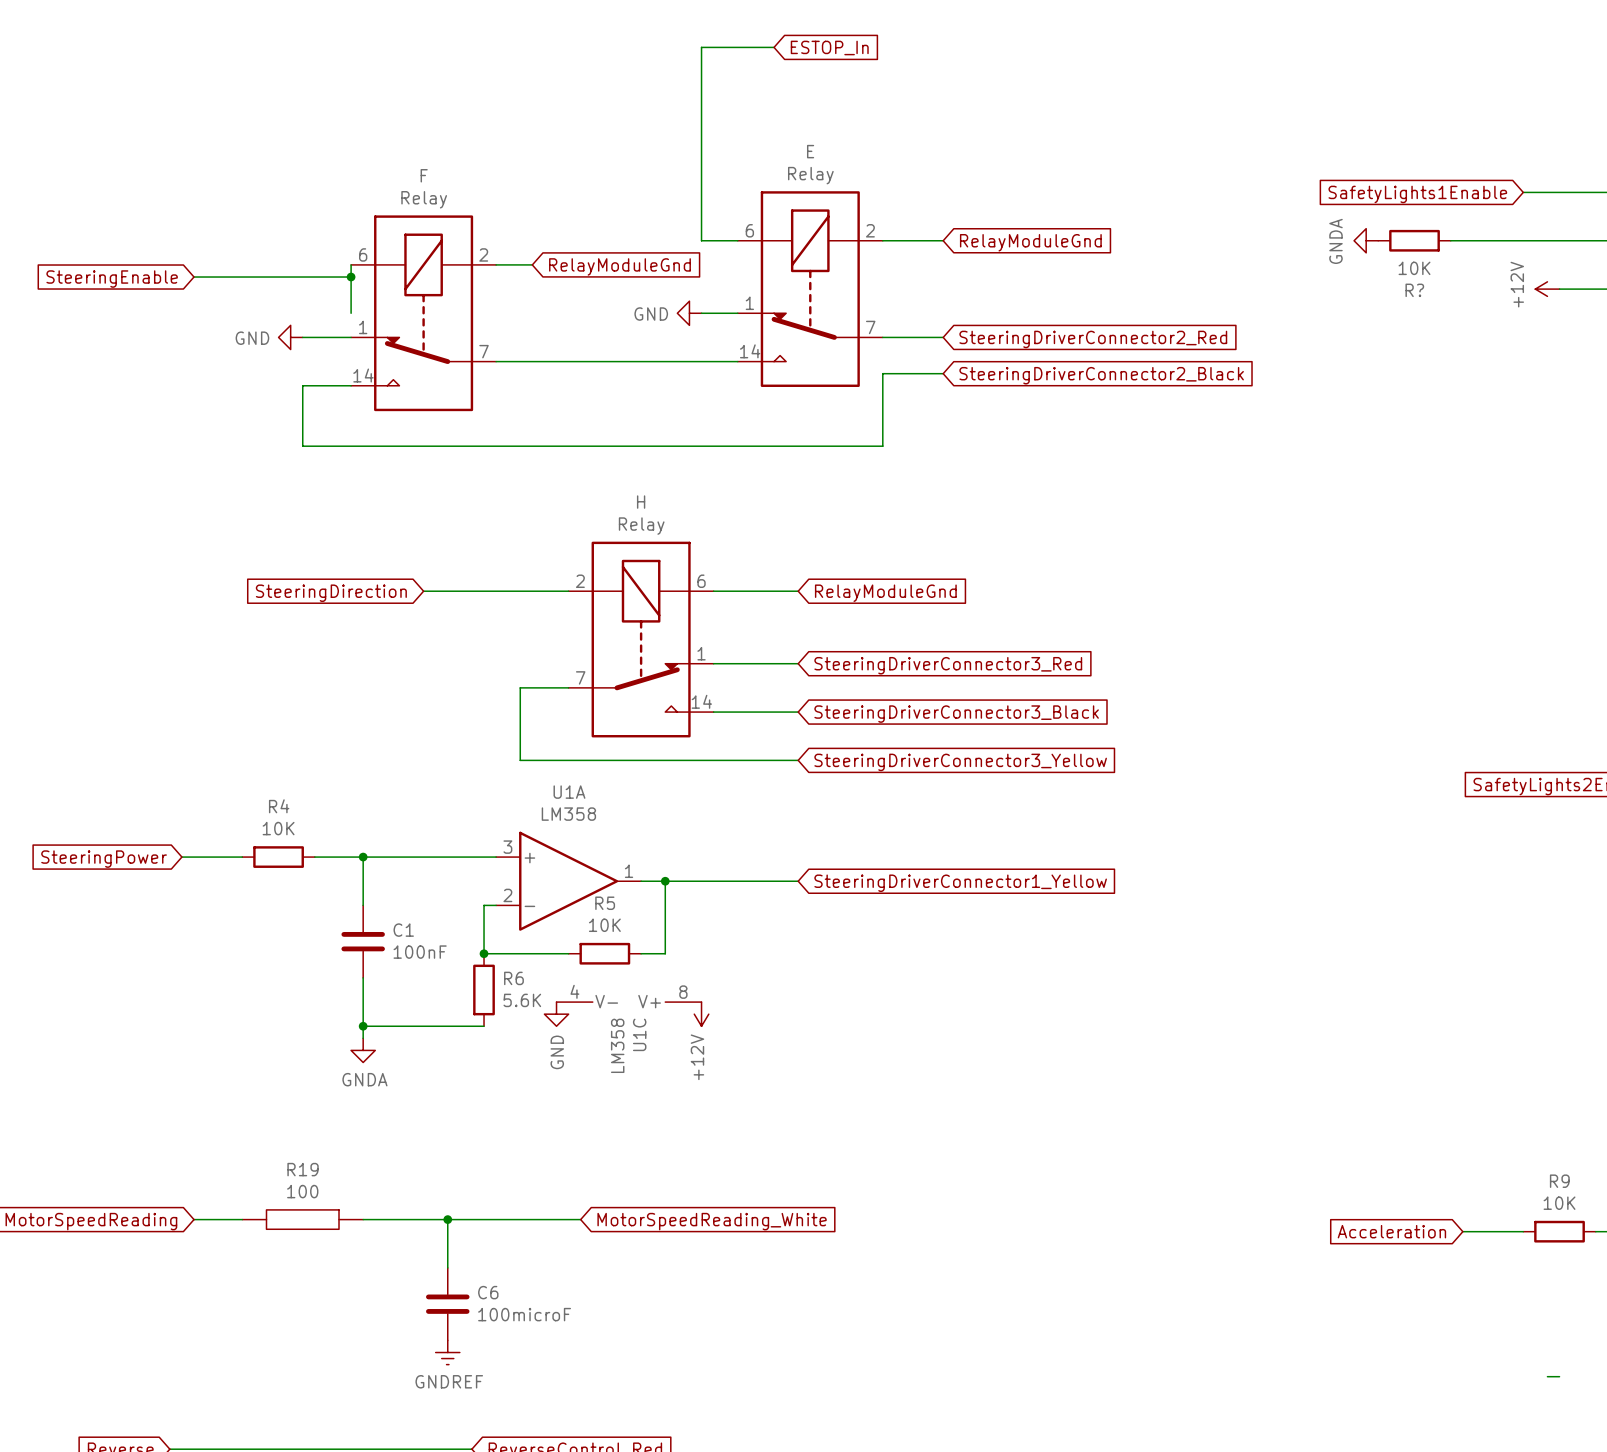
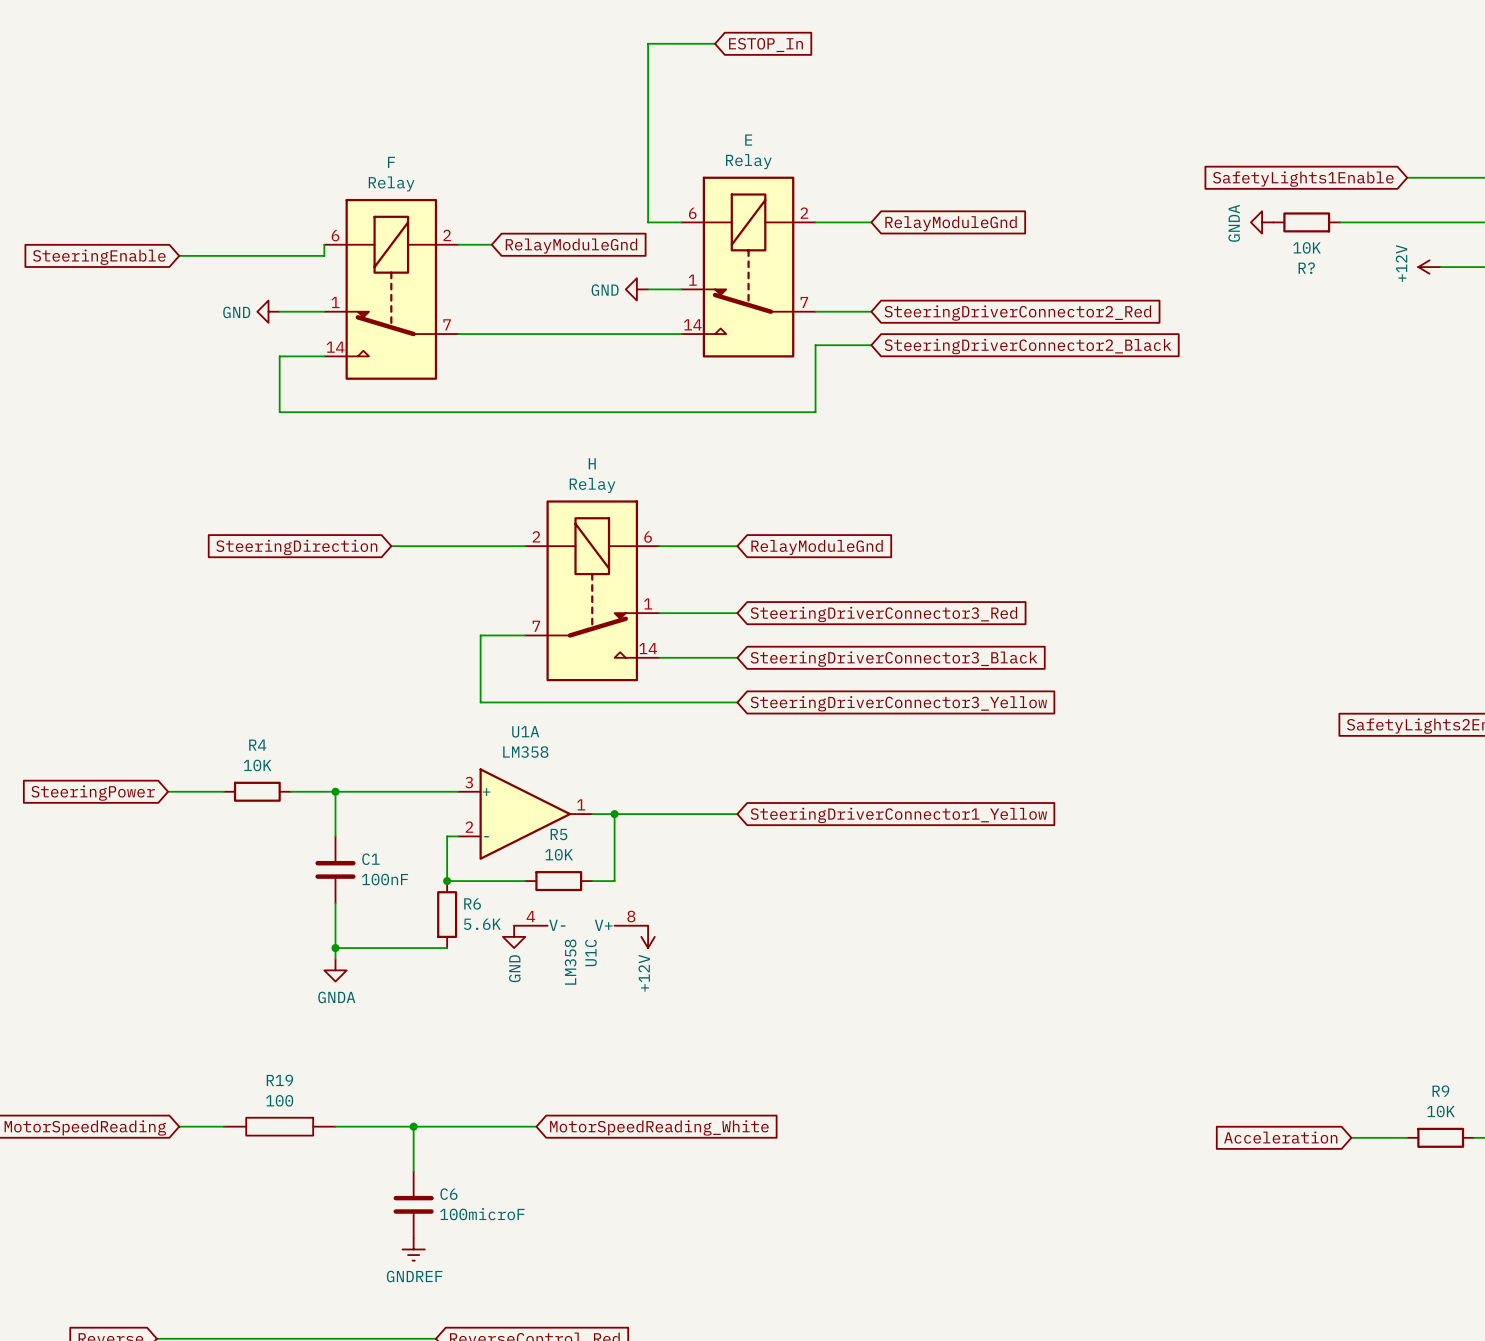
wire: (351, 277) (351, 313) -> none
junction: (351, 277) -> none
wire: (1547, 1376) (1559, 1376) -> none

